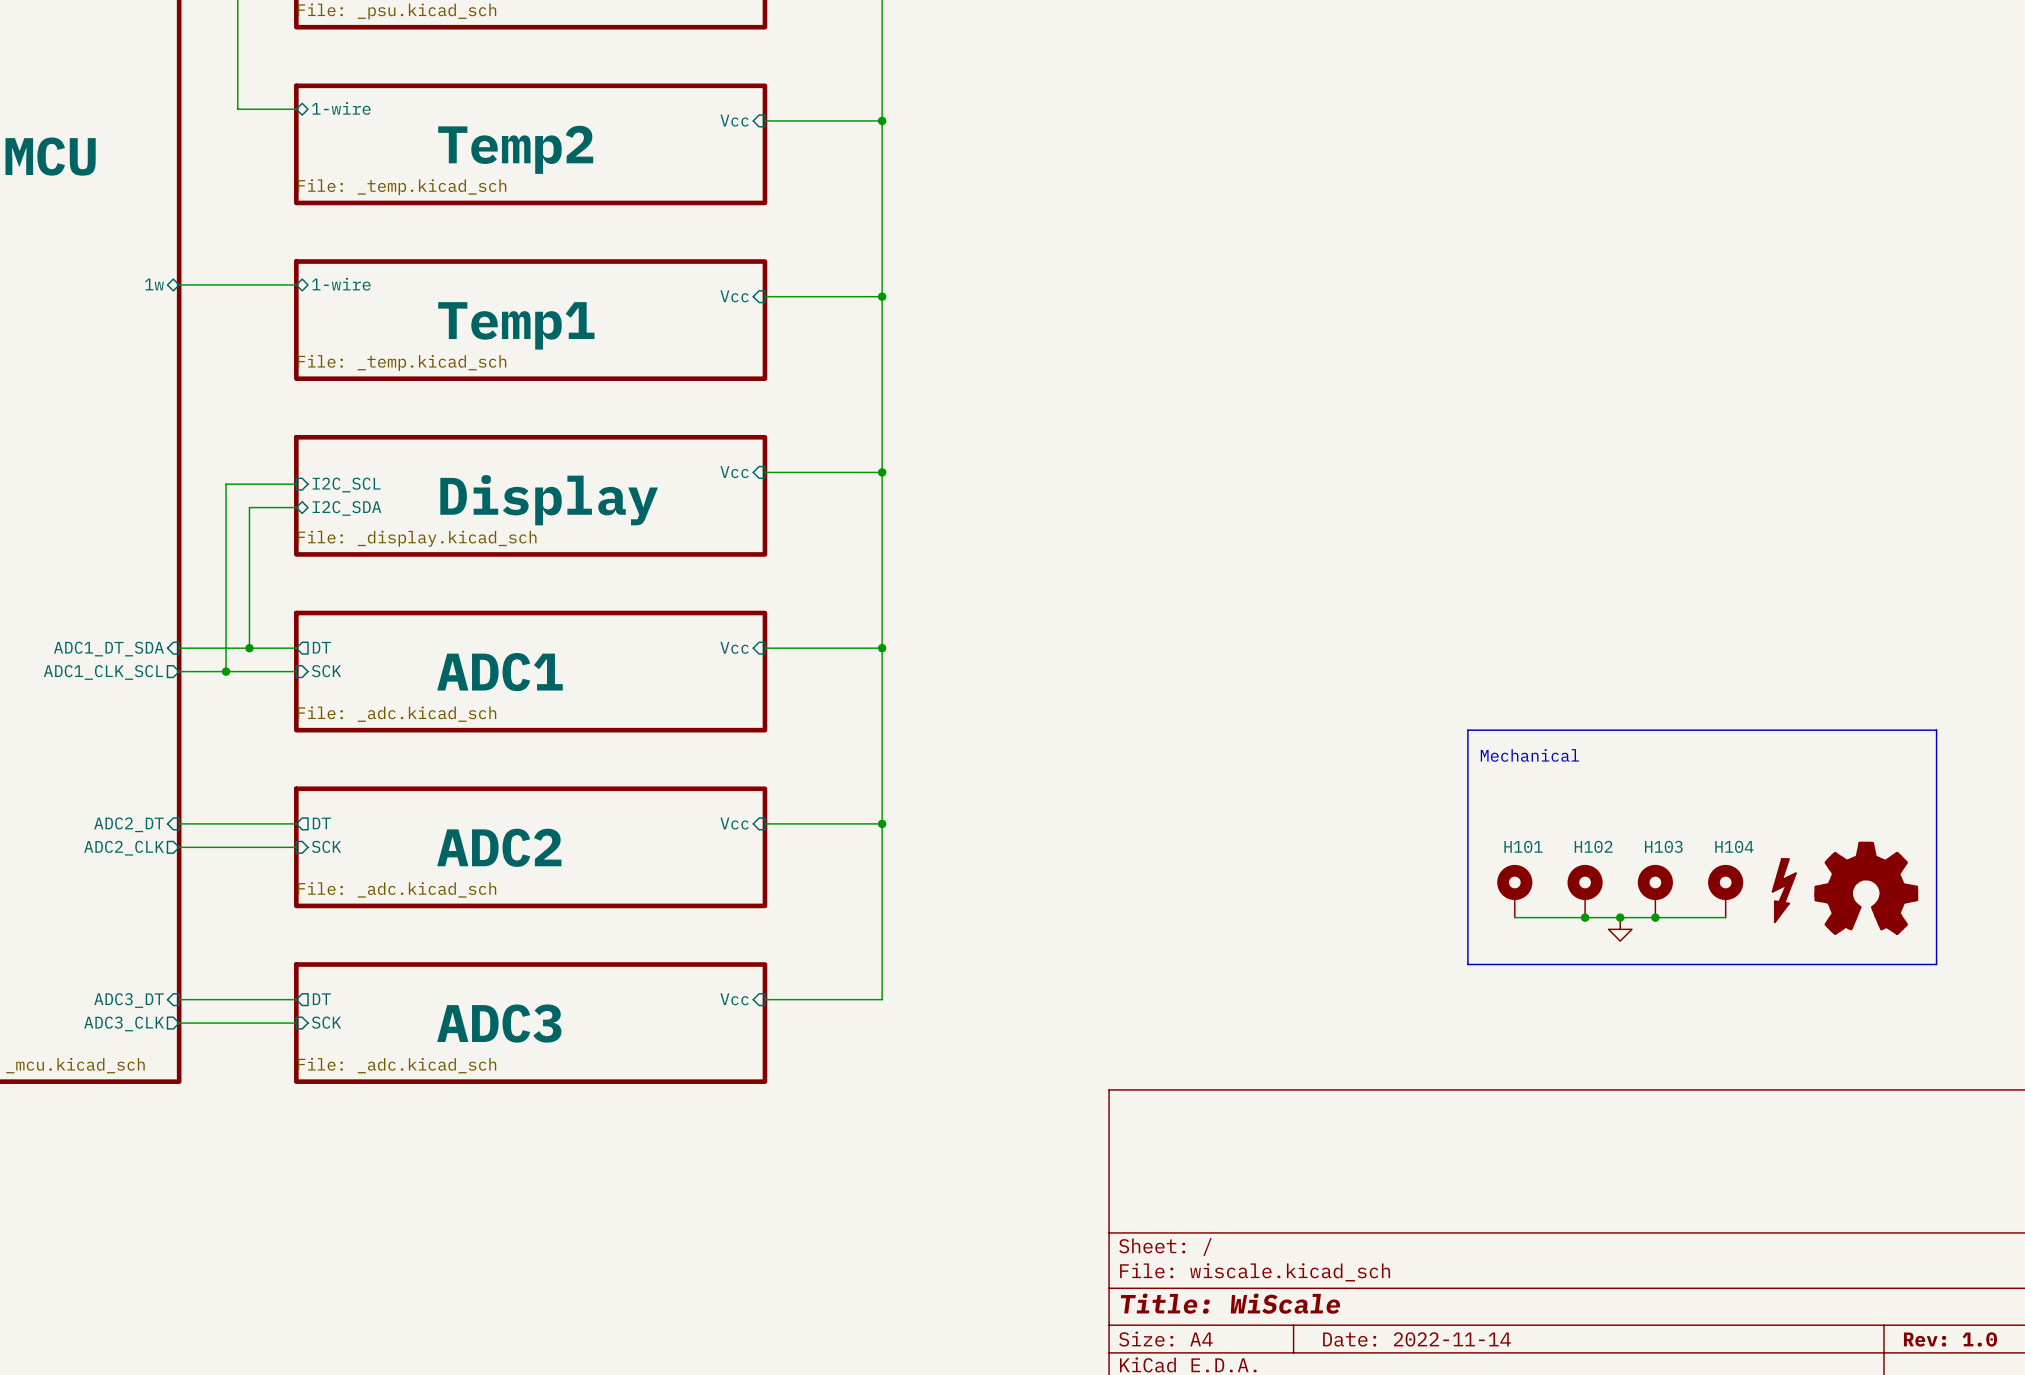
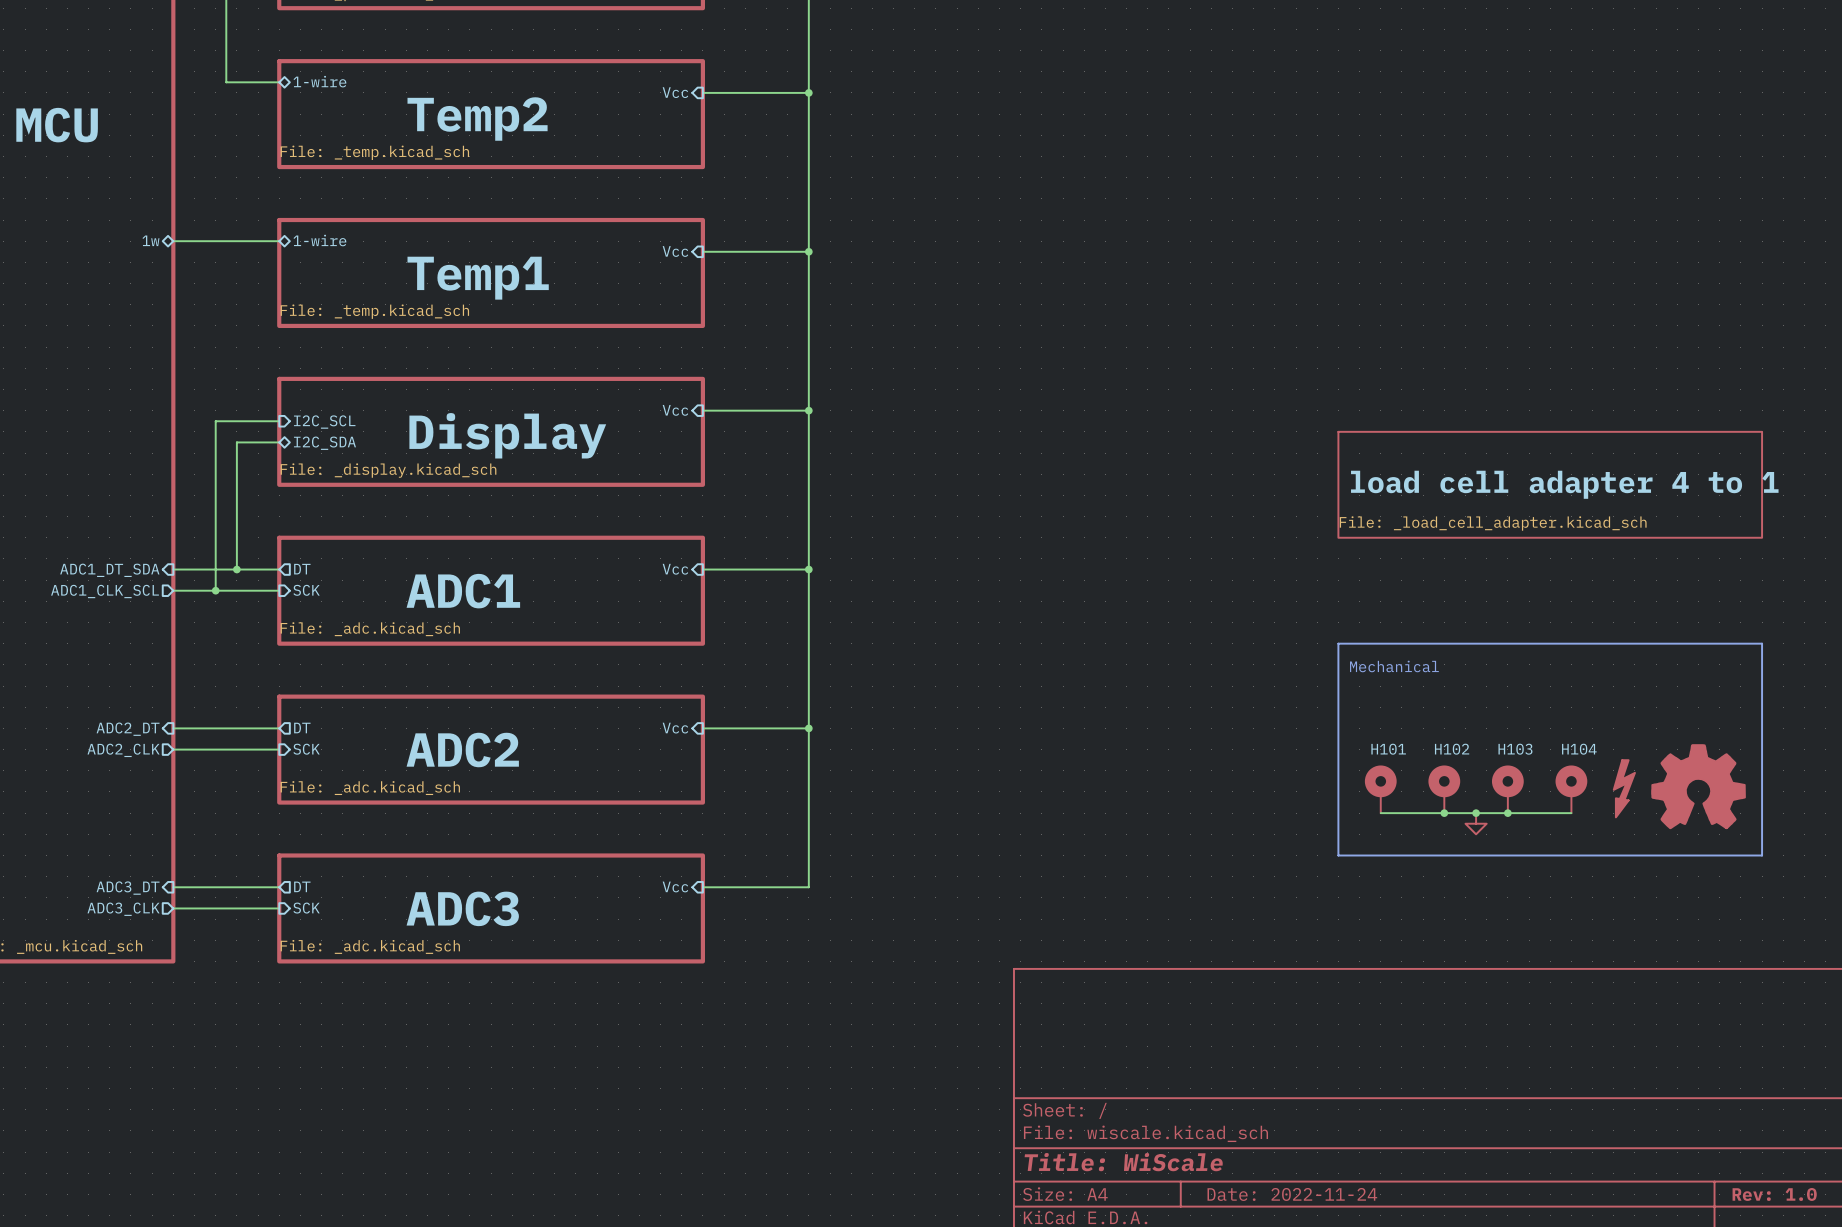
sheet load cell adapter 4 to 1: none -> File: _load_cell_adapter.kicad_sch (1550, 484)
title block: Date: 2022-11-14 (1416, 1339) -> Date: 2022-11-24 (1292, 1194)

